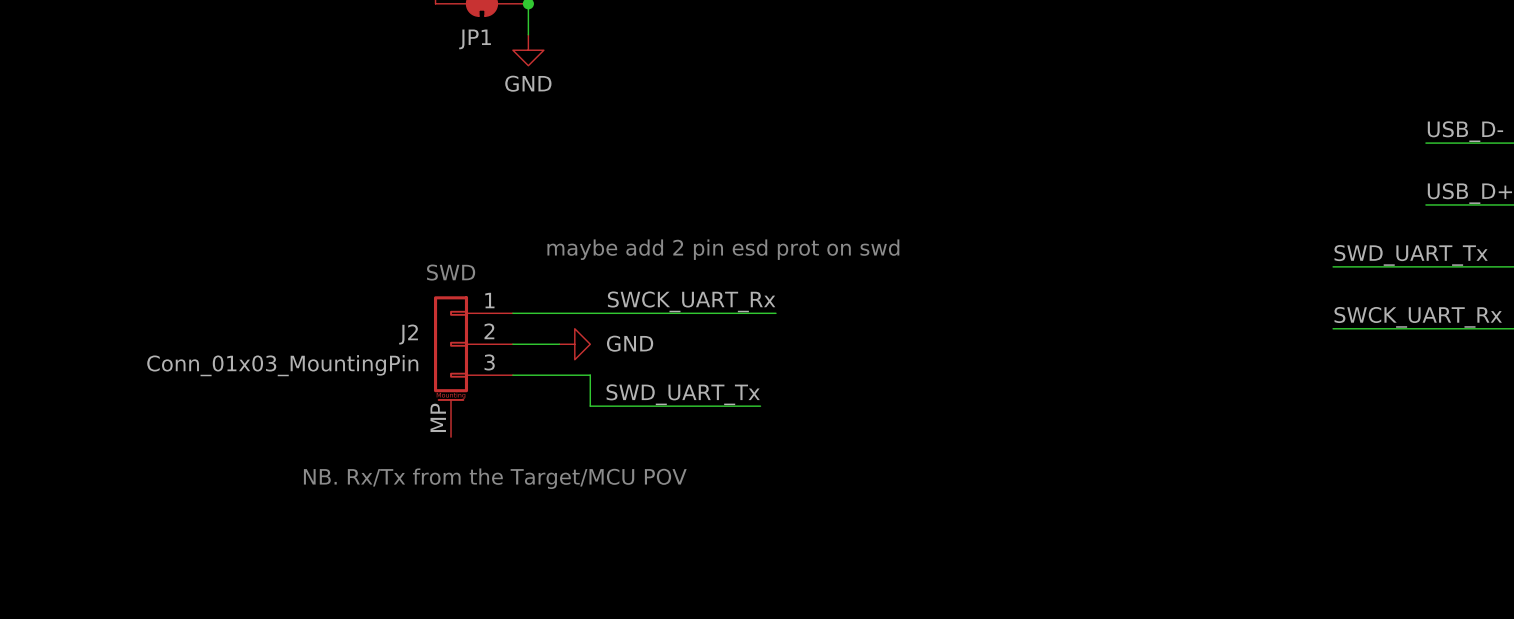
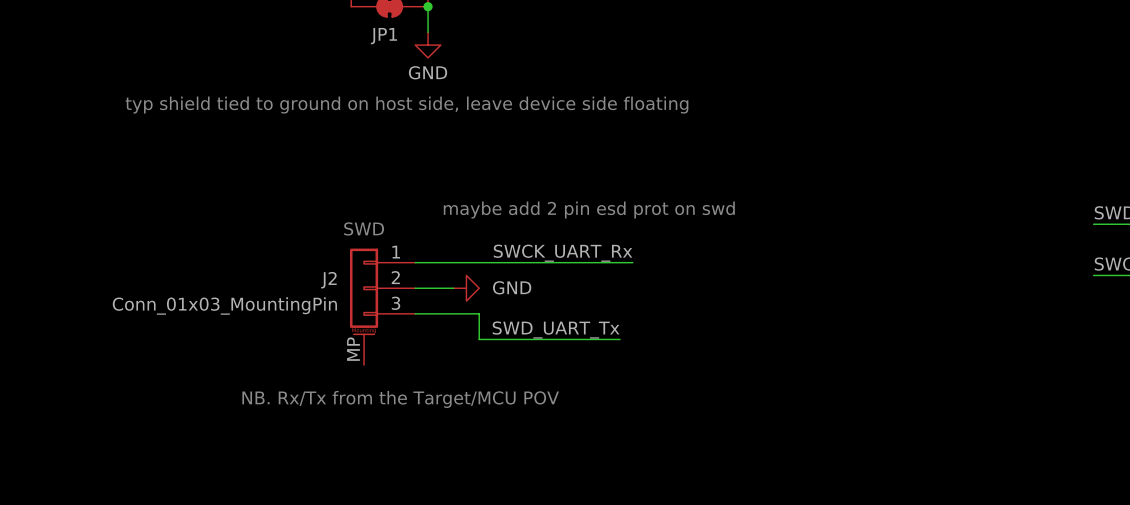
text: none -> typ shield tied to ground on host side, leave device side floating (407, 105)

